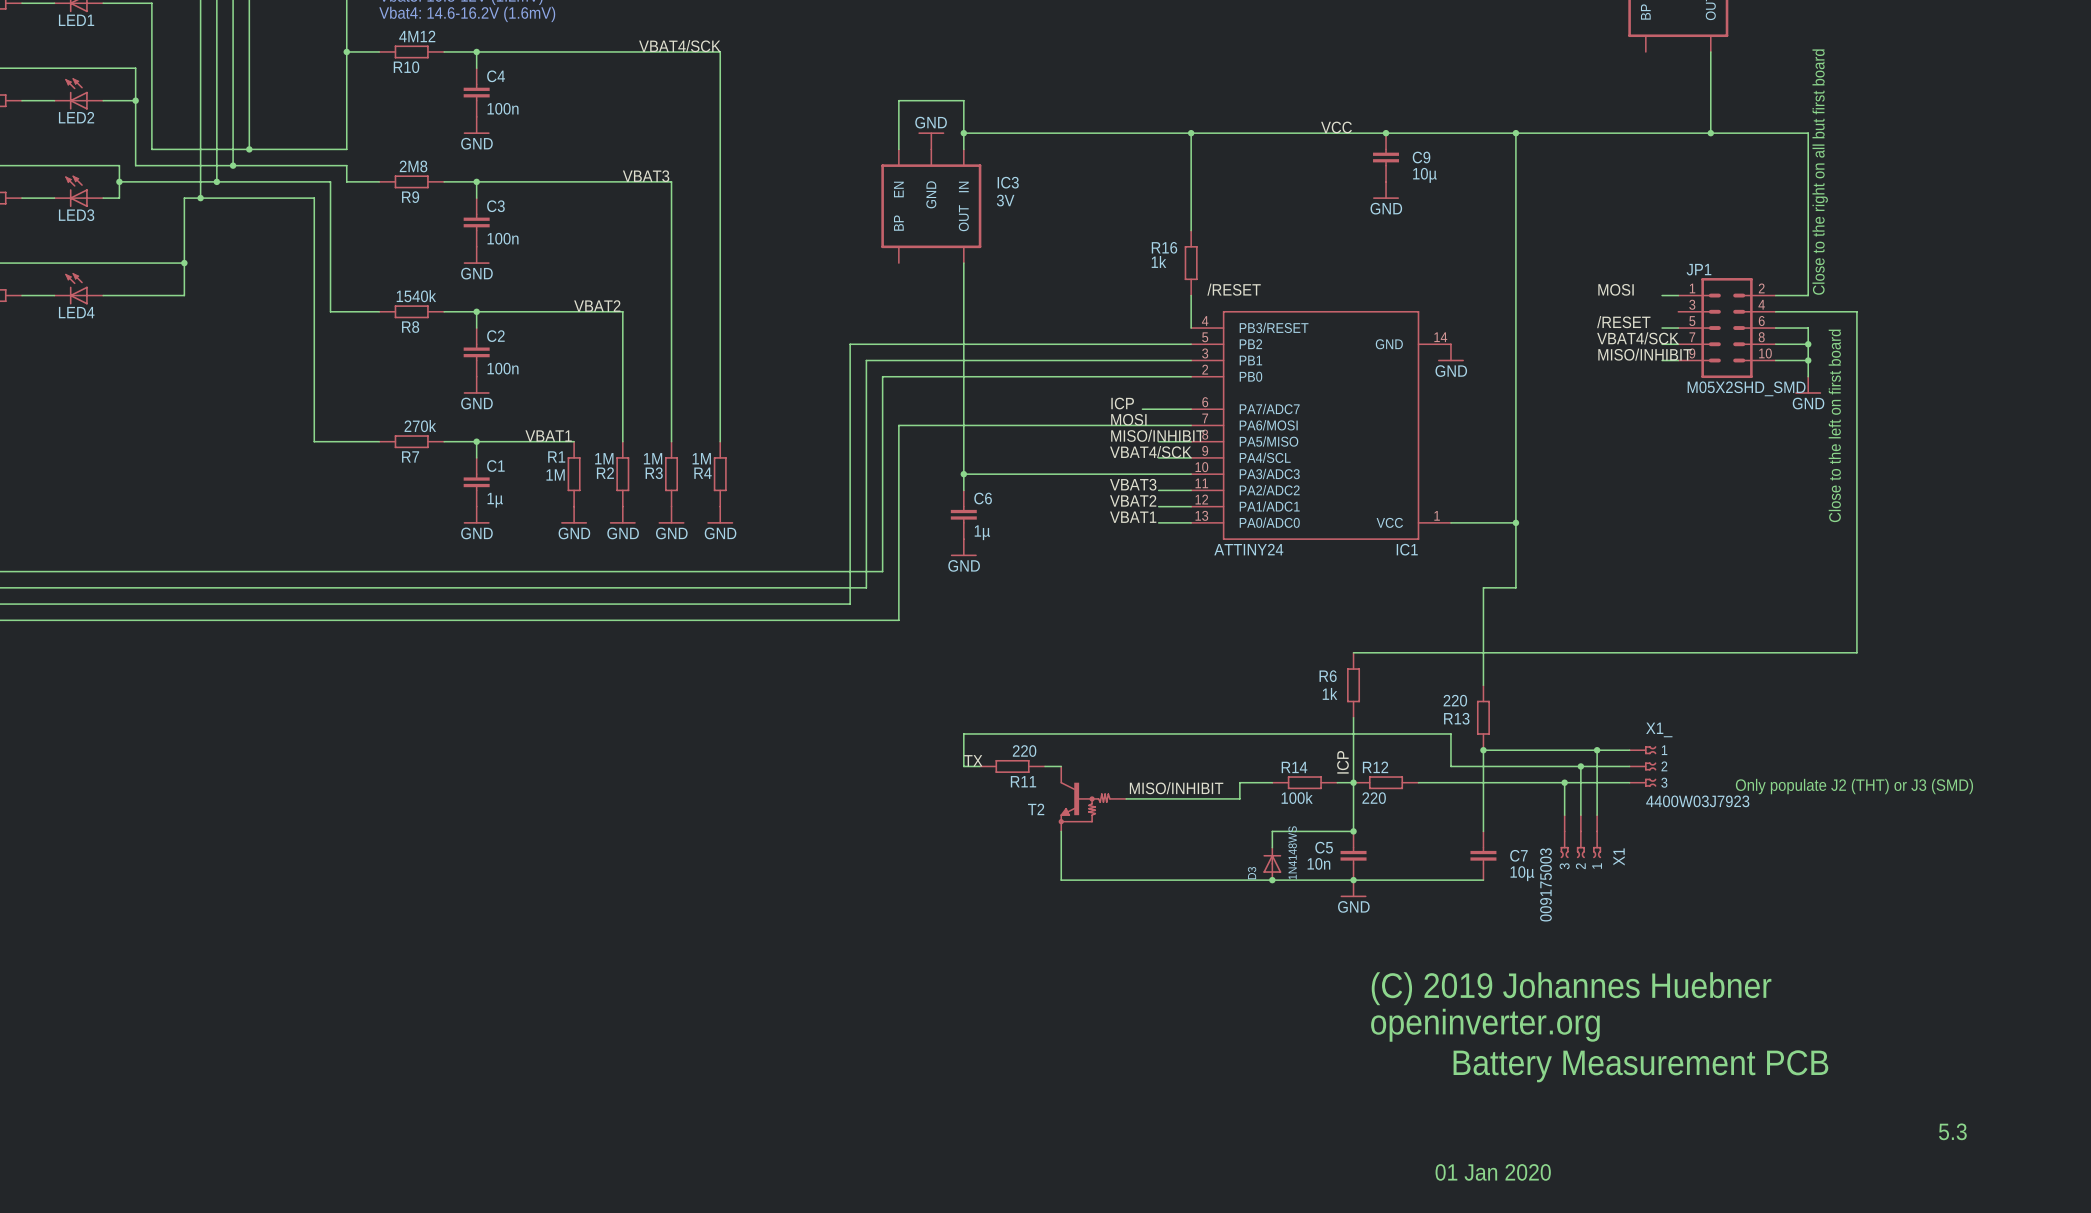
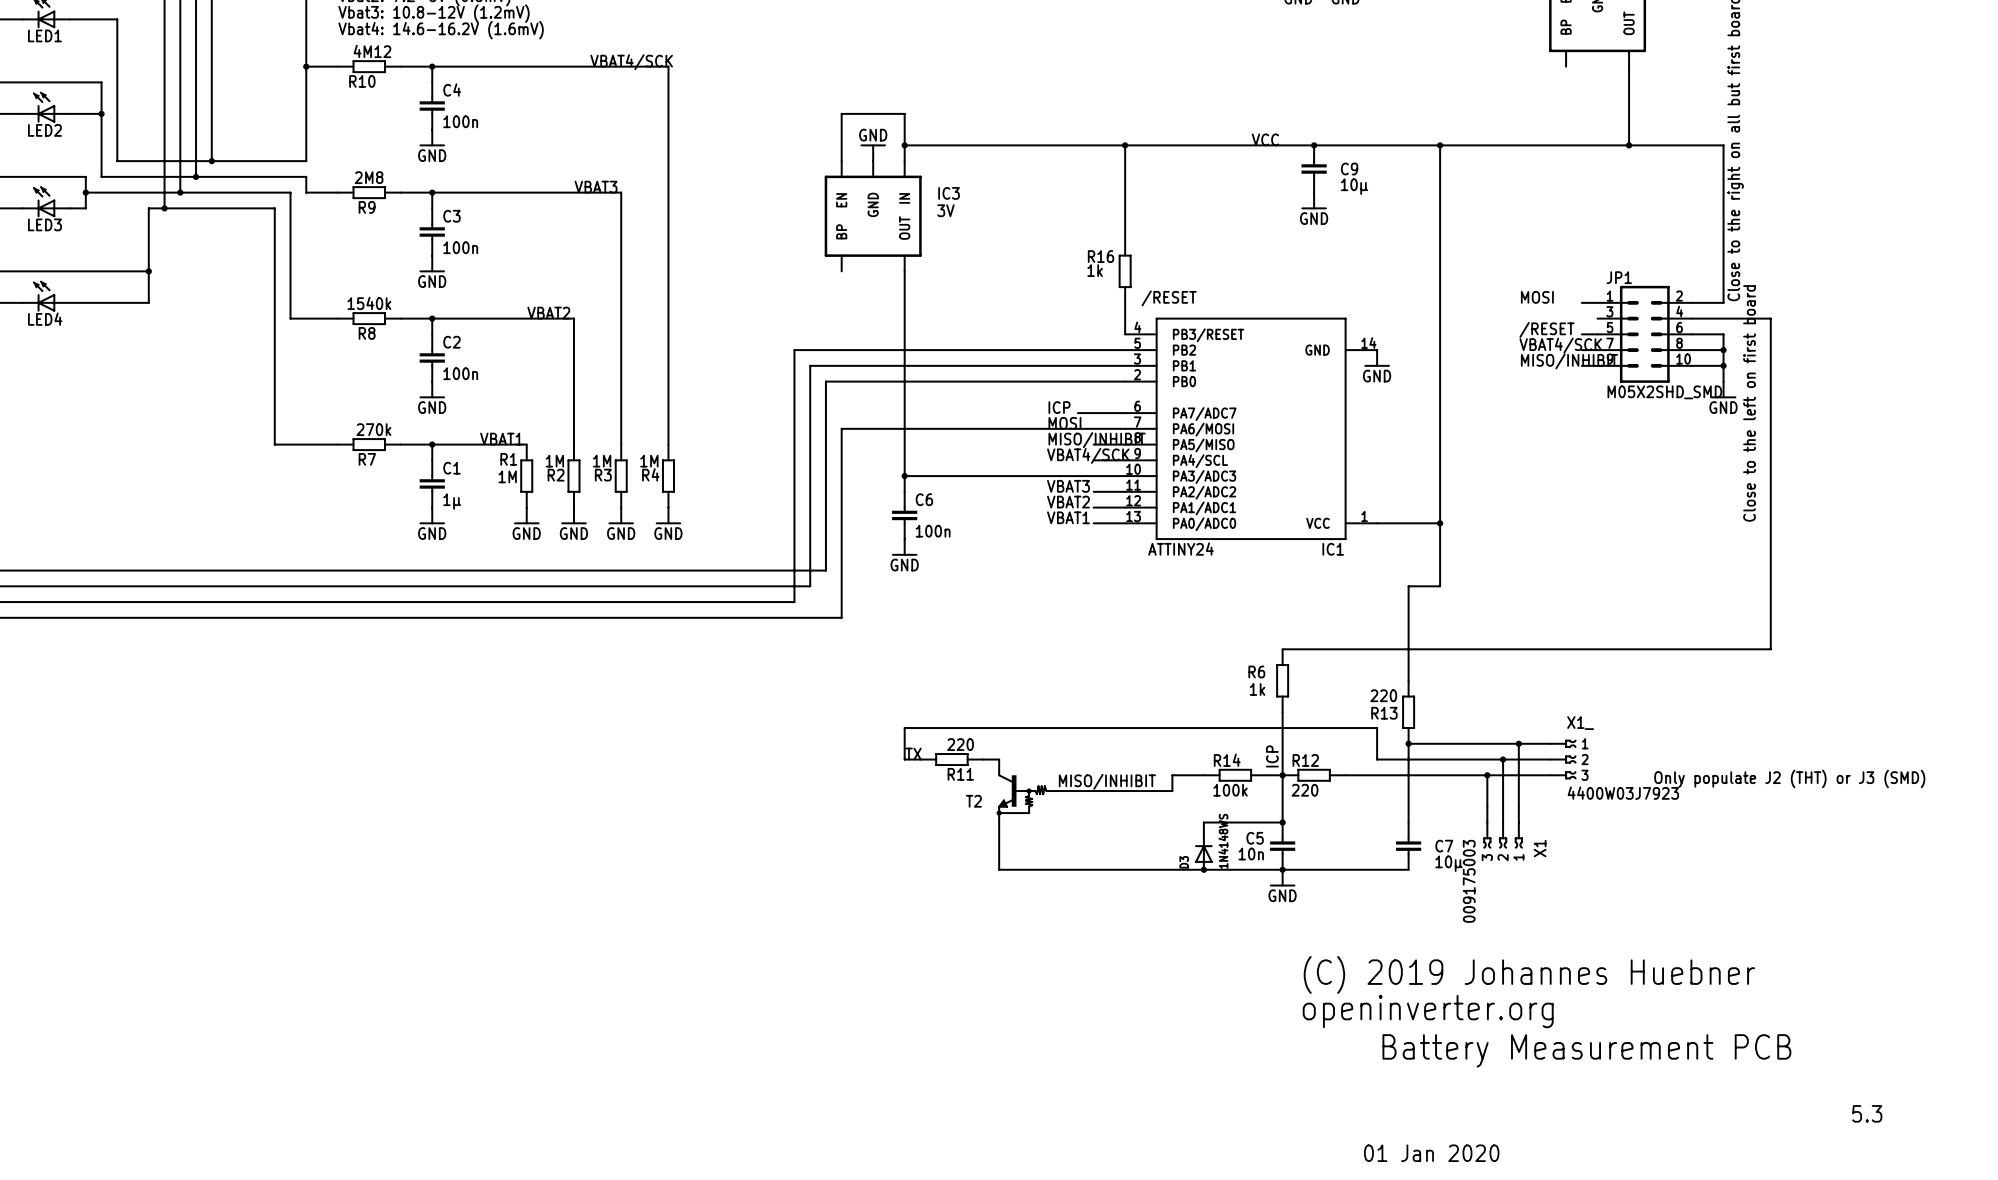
C6 value: 1µ (982, 532) -> 100n (933, 531)

